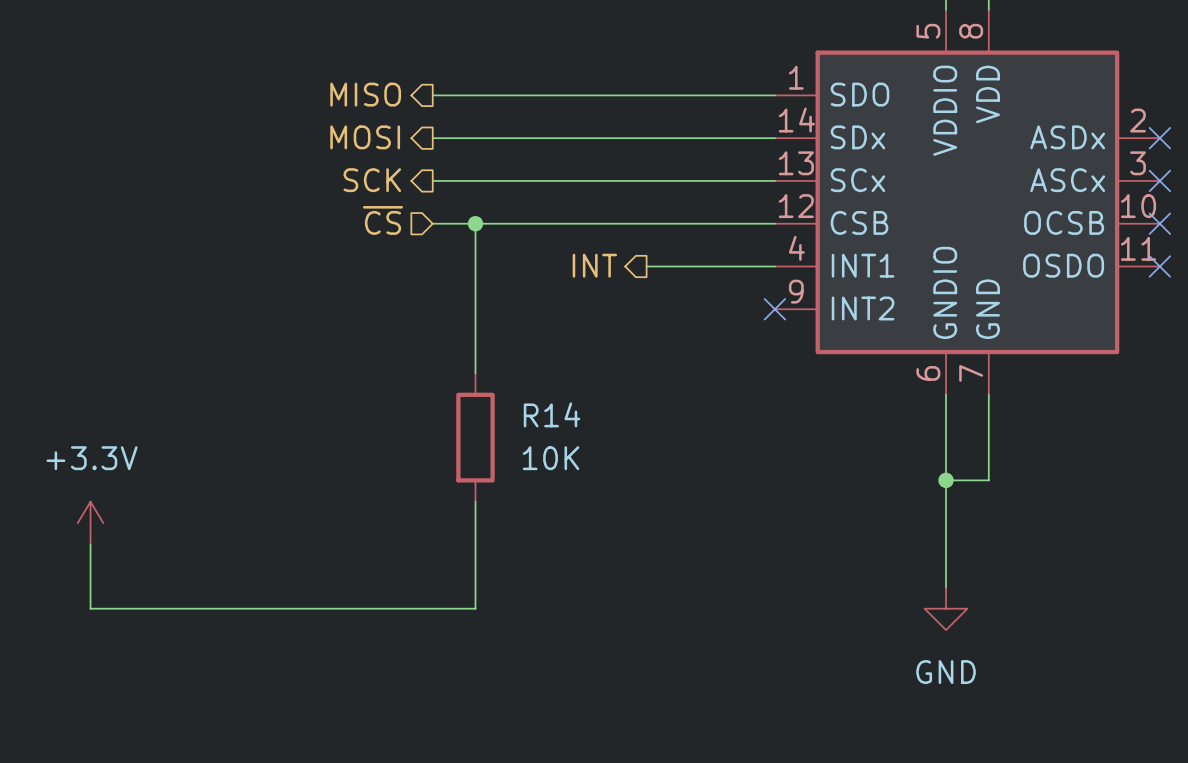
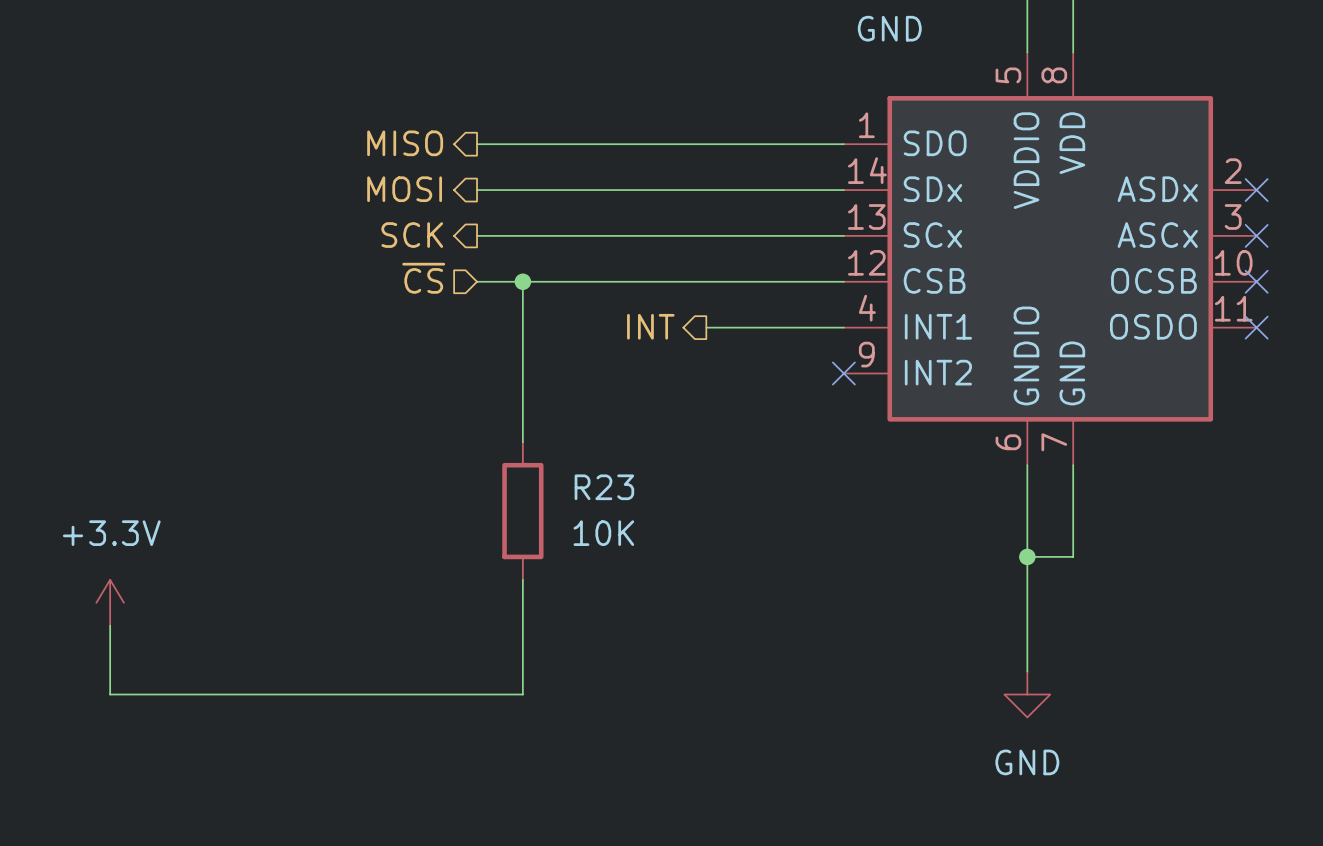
R14 name: R14 (552, 414) -> R23 (604, 487)

